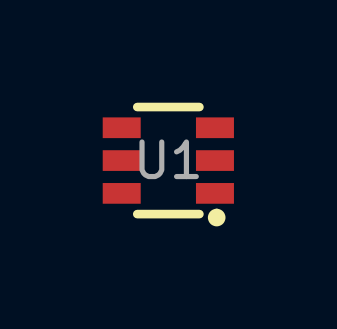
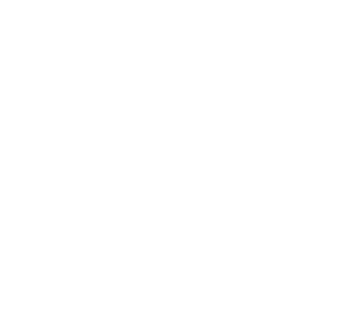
U1: (168, 164) -> none

